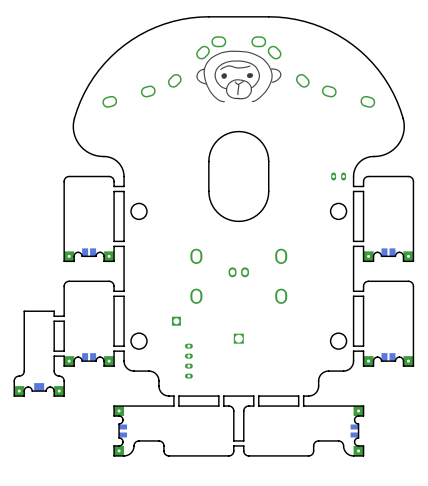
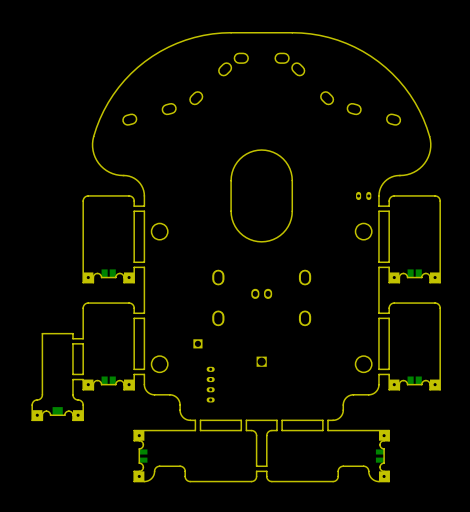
drawing: [196, 50, 282, 103] -> none

